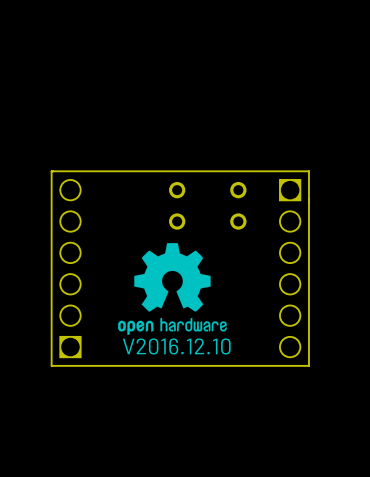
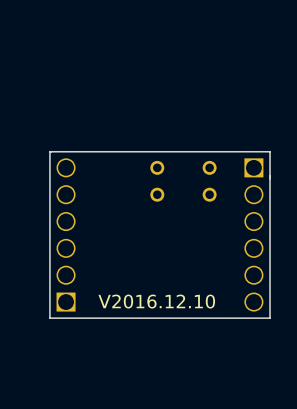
drawing: [118, 243, 227, 336] -> none

